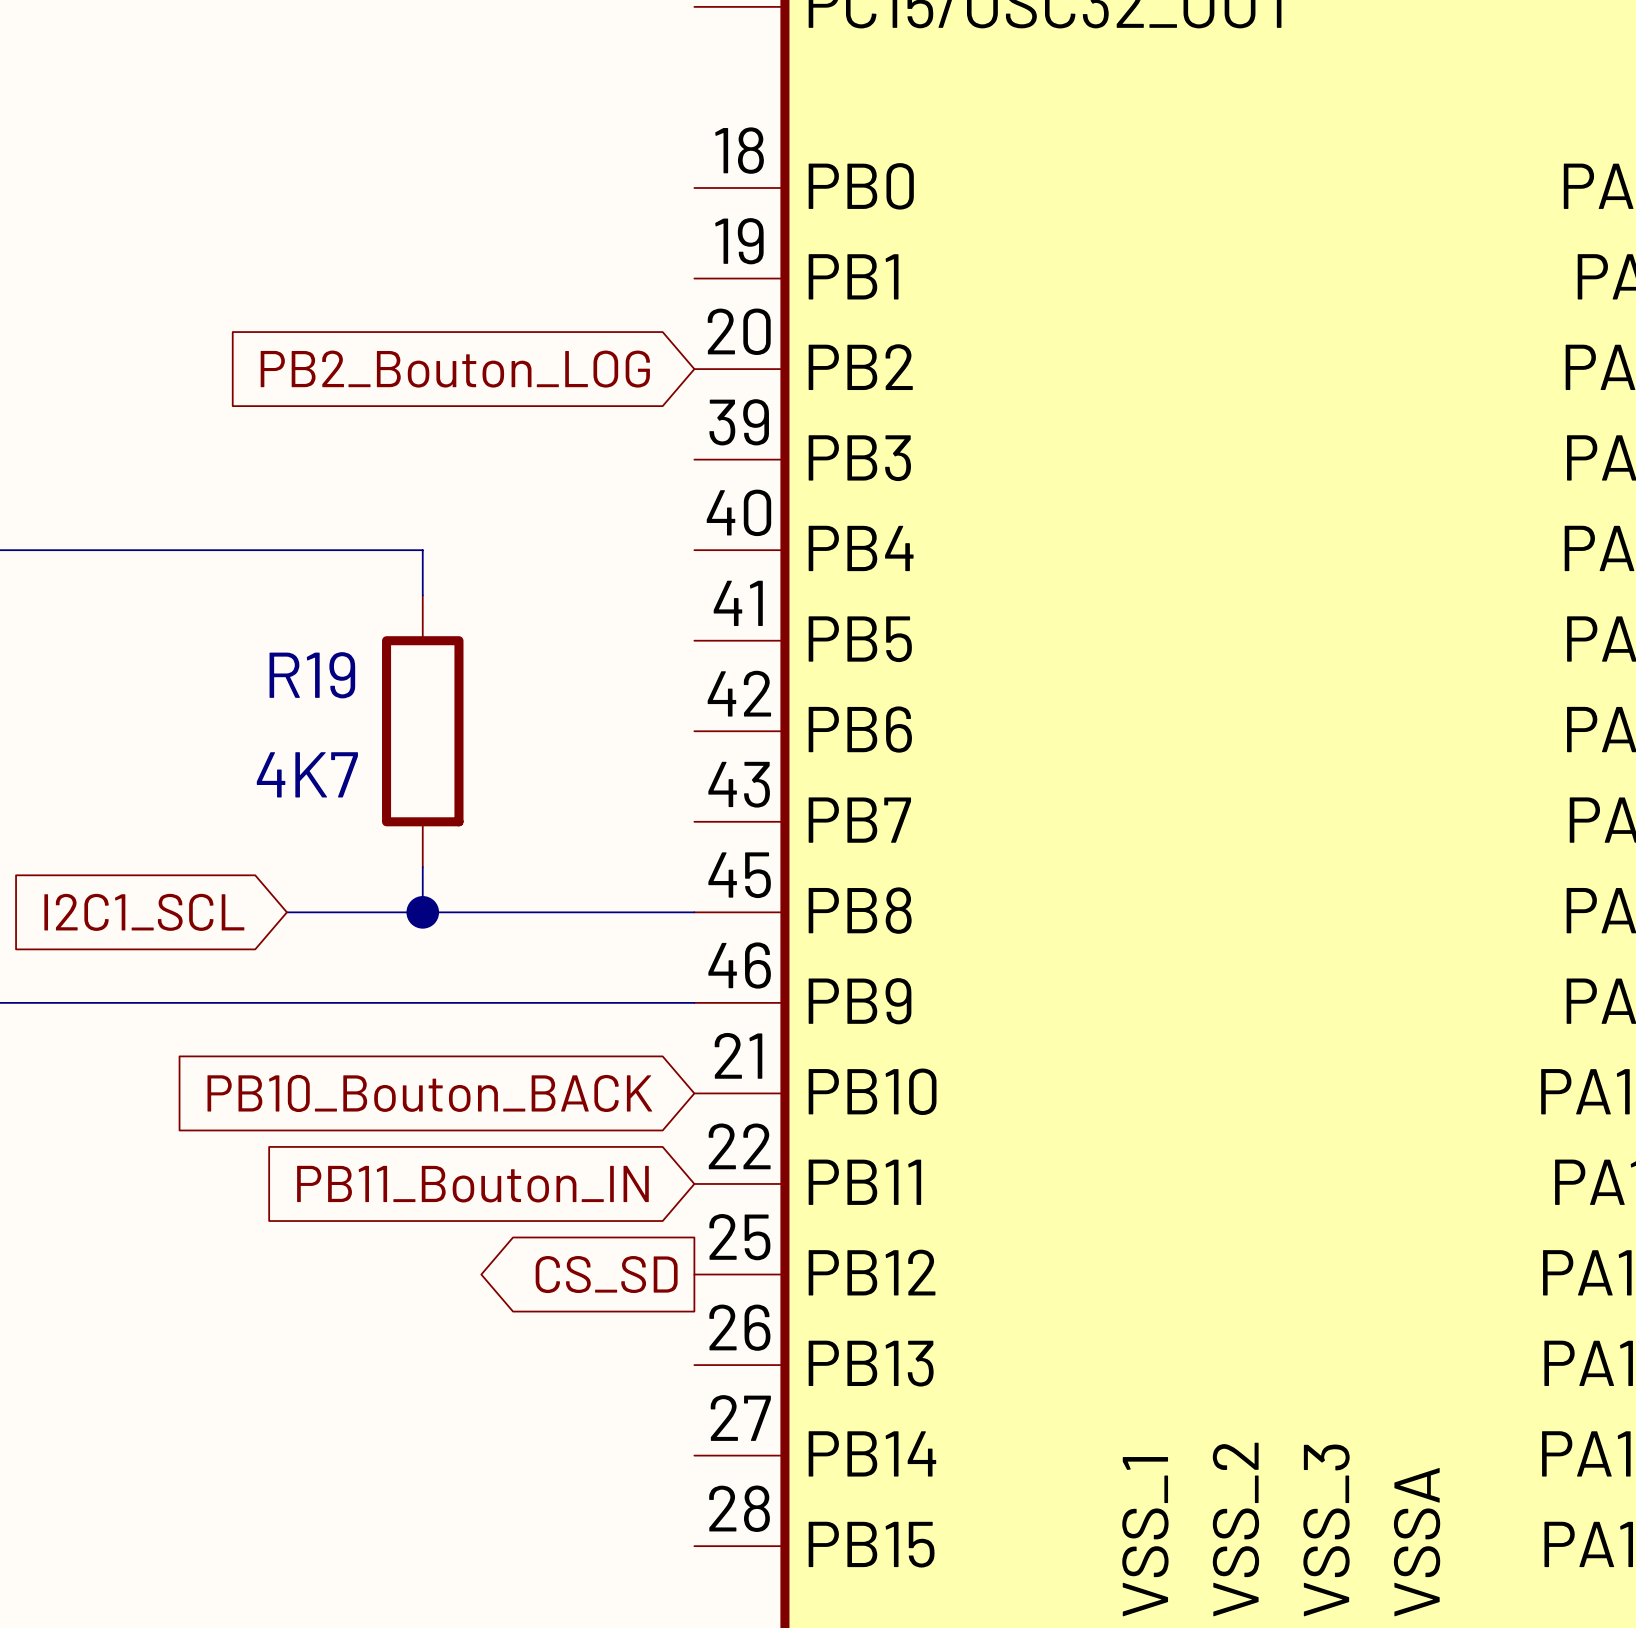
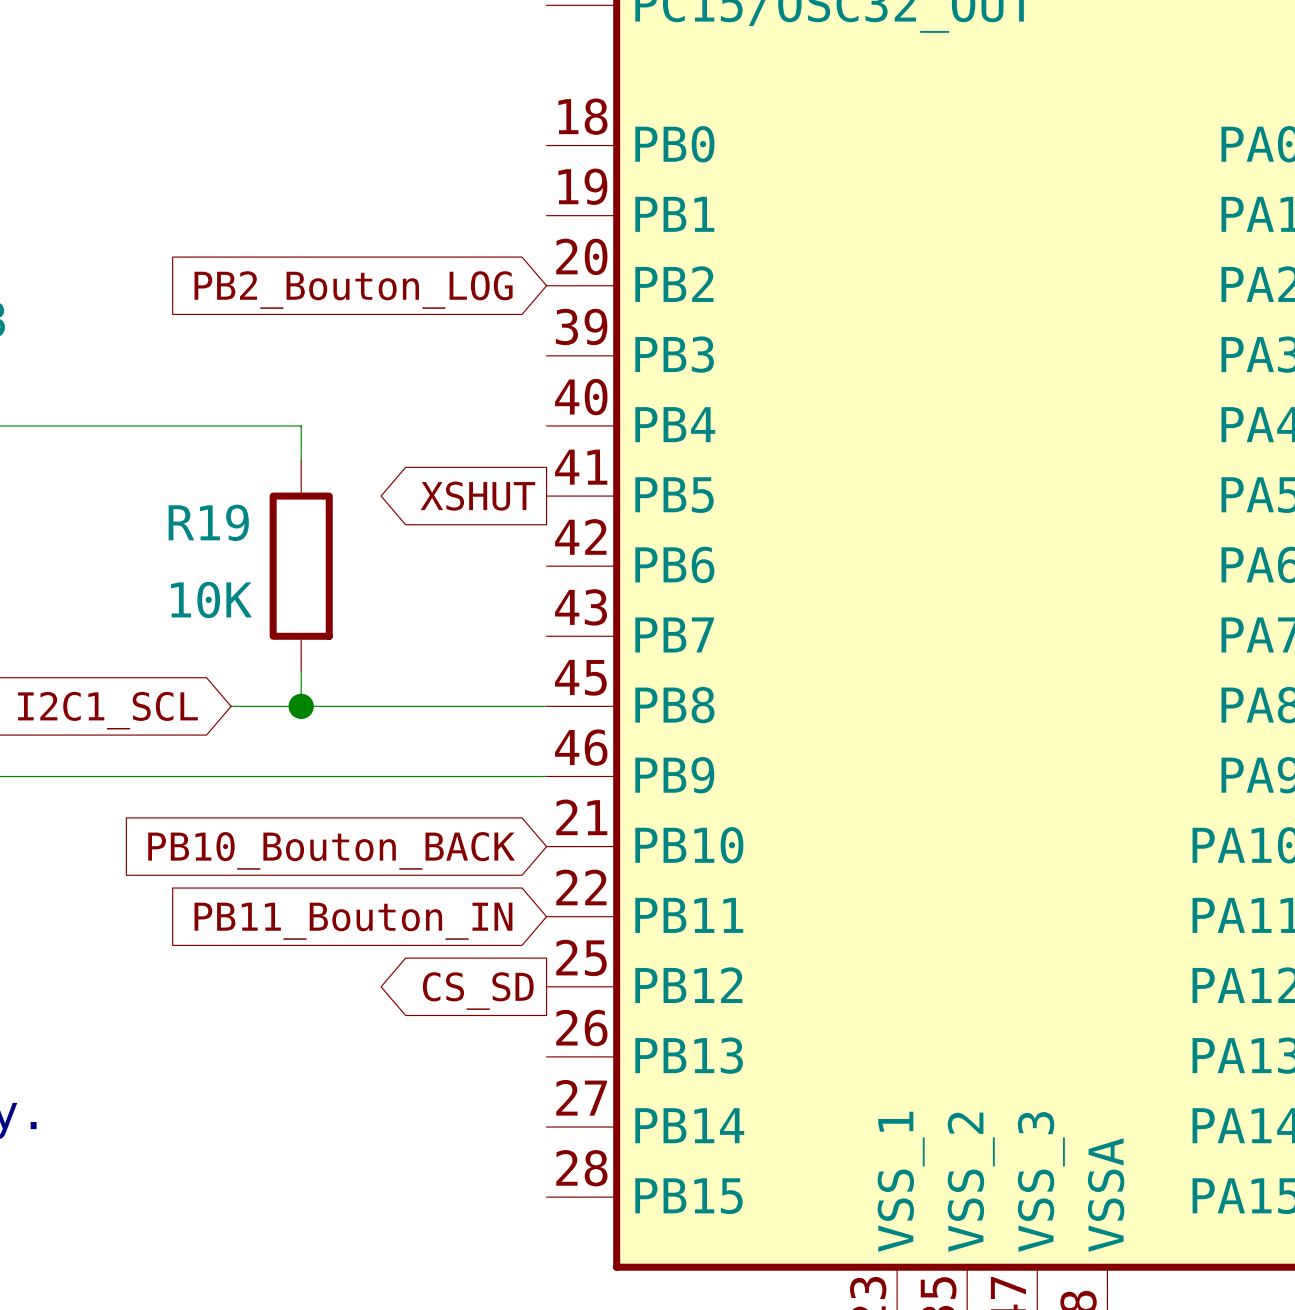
wire: (377, 550) (422, 550) (422, 595) -> (301, 425) (301, 461)
global label: none -> XSHUT (477, 496)
R19 position: (422, 731) -> (301, 566)
R19 value: 4K7 (307, 774) -> 10K (211, 599)
wire: (422, 867) (422, 912) -> (301, 671) (301, 706)
junction position: (422, 912) -> (301, 706)

